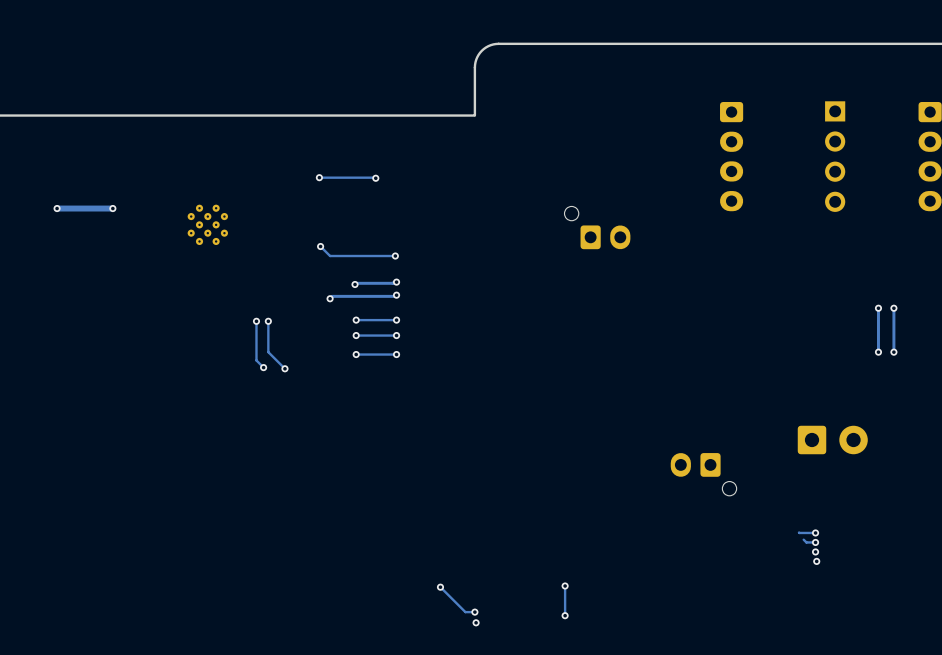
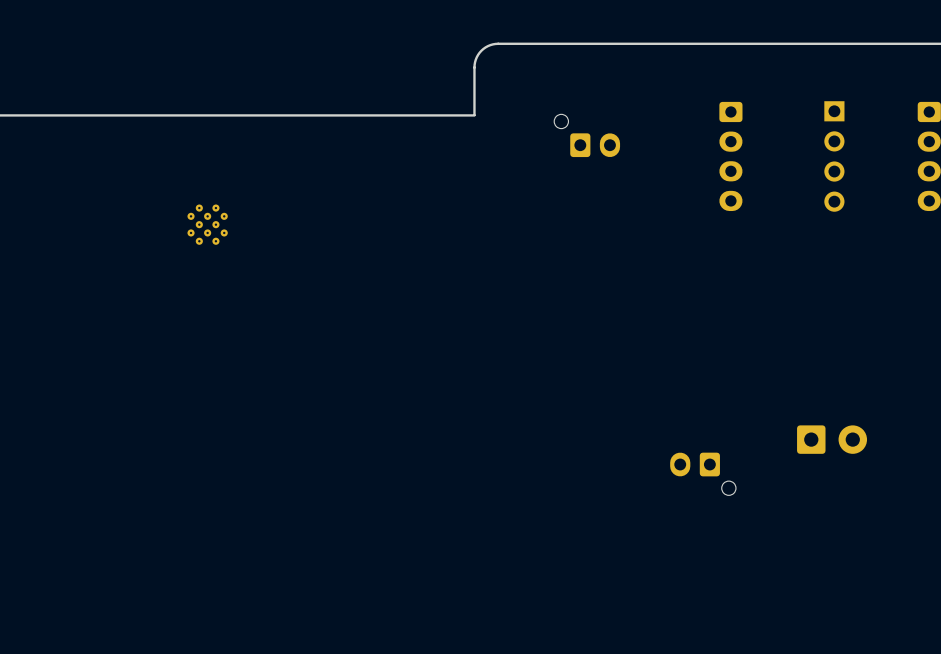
track: (319, 177) (375, 178) -> none
via: (319, 177) -> none
via: (375, 178) -> none
via: (57, 208) -> none
track: (112, 208) (57, 208) -> none
via: (112, 208) -> none
part position: (597, 227) -> (587, 135)
track: (320, 246) (330, 256) (395, 256) -> none
via: (320, 246) -> none
via: (395, 256) -> none
track: (394, 282) (355, 284) -> none
via: (396, 282) -> none
via: (355, 284) -> none
track: (396, 295) (332, 296) (330, 298) -> none
via: (396, 295) -> none
via: (330, 298) -> none
track: (878, 308) (878, 352) -> none
via: (878, 308) -> none
track: (893, 308) (893, 352) -> none
via: (893, 308) -> none
via: (356, 320) -> none
track: (396, 320) (356, 320) -> none
via: (396, 320) -> none
track: (256, 321) (256, 360) (263, 367) -> none
via: (256, 321) -> none
track: (268, 321) (268, 352) (284, 368) -> none
via: (268, 321) -> none
via: (356, 335) -> none
track: (396, 335) (356, 335) -> none
via: (396, 335) -> none
via: (878, 352) -> none
via: (893, 352) -> none
via: (356, 354) -> none
track: (396, 354) (356, 354) -> none
via: (396, 354) -> none
via: (263, 367) -> none
via: (284, 368) -> none
track: (798, 532) (815, 532) -> none
via: (815, 532) -> none
track: (803, 539) (806, 542) (815, 542) -> none
via: (815, 542) -> none
via: (815, 551) -> none
via: (816, 561) -> none
track: (565, 586) (565, 615) -> none
via: (565, 586) -> none
track: (440, 587) (465, 612) (474, 612) -> none
via: (440, 587) -> none
via: (474, 612) -> none
via: (565, 615) -> none
via: (476, 622) -> none

